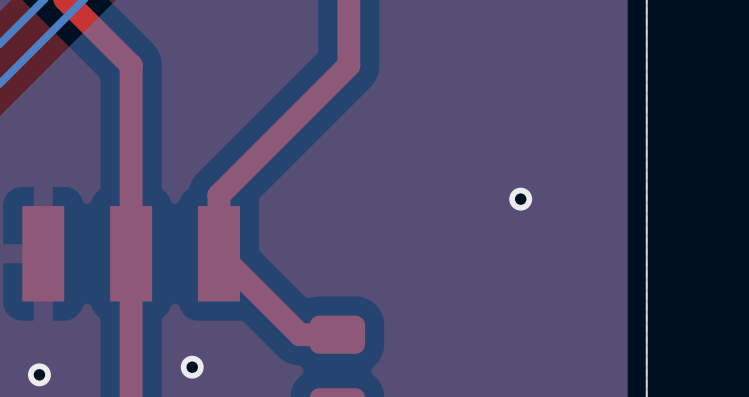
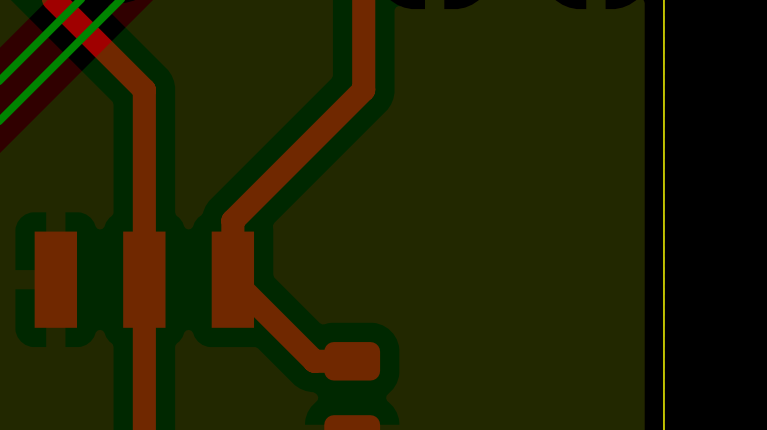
via: (520, 199) -> none
via: (192, 367) -> none
via: (39, 374) -> none

